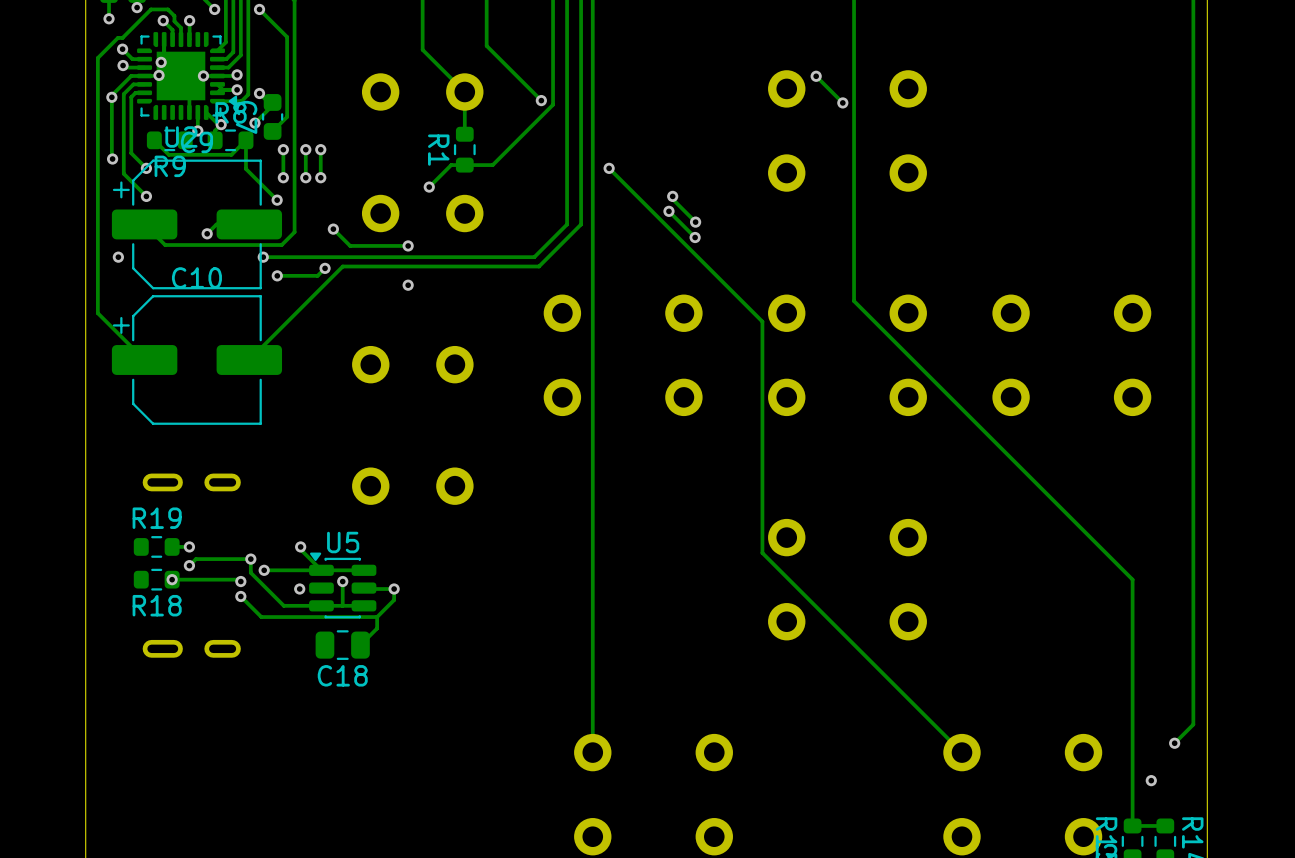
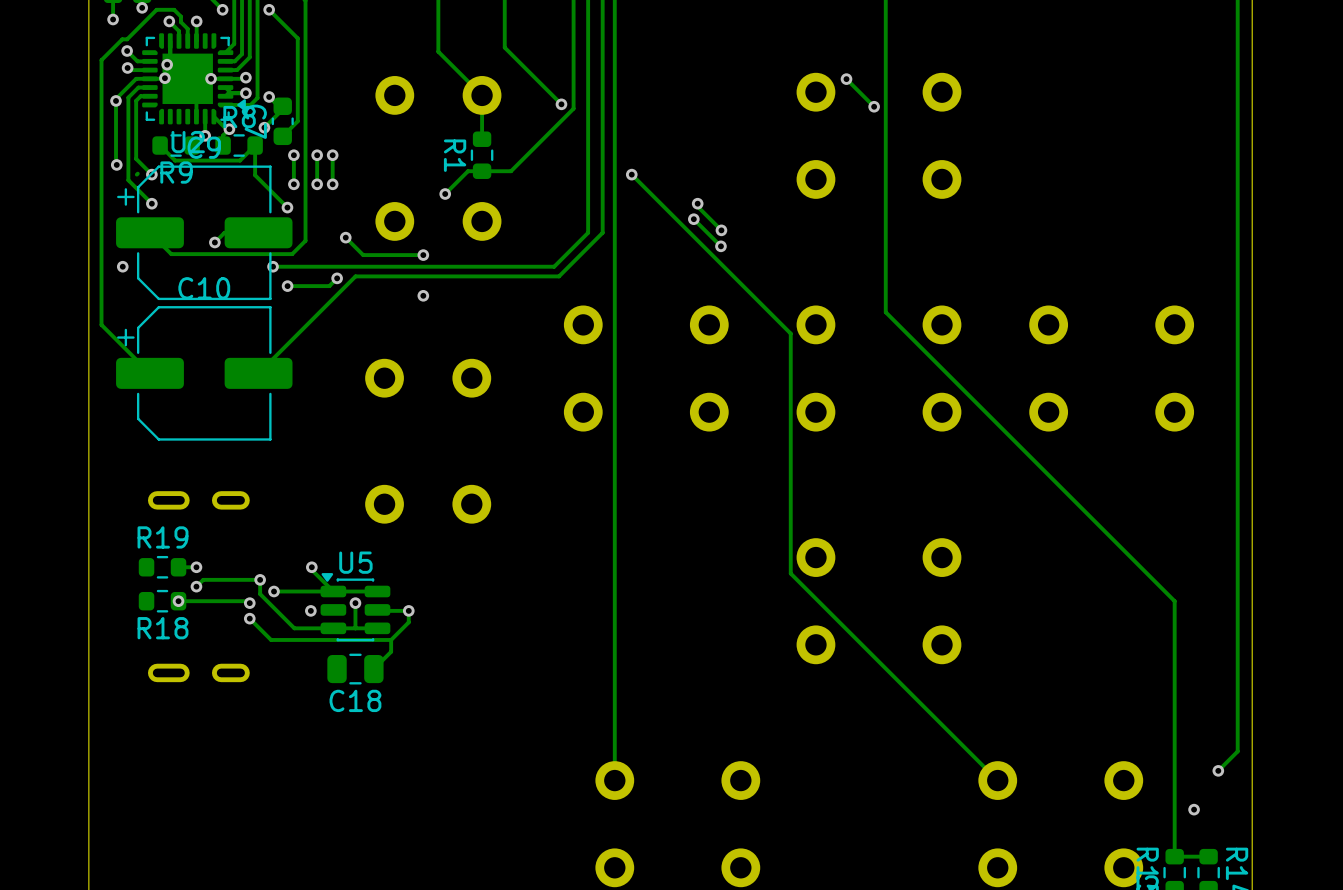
track: none -> (137, 173) (136, 174)

